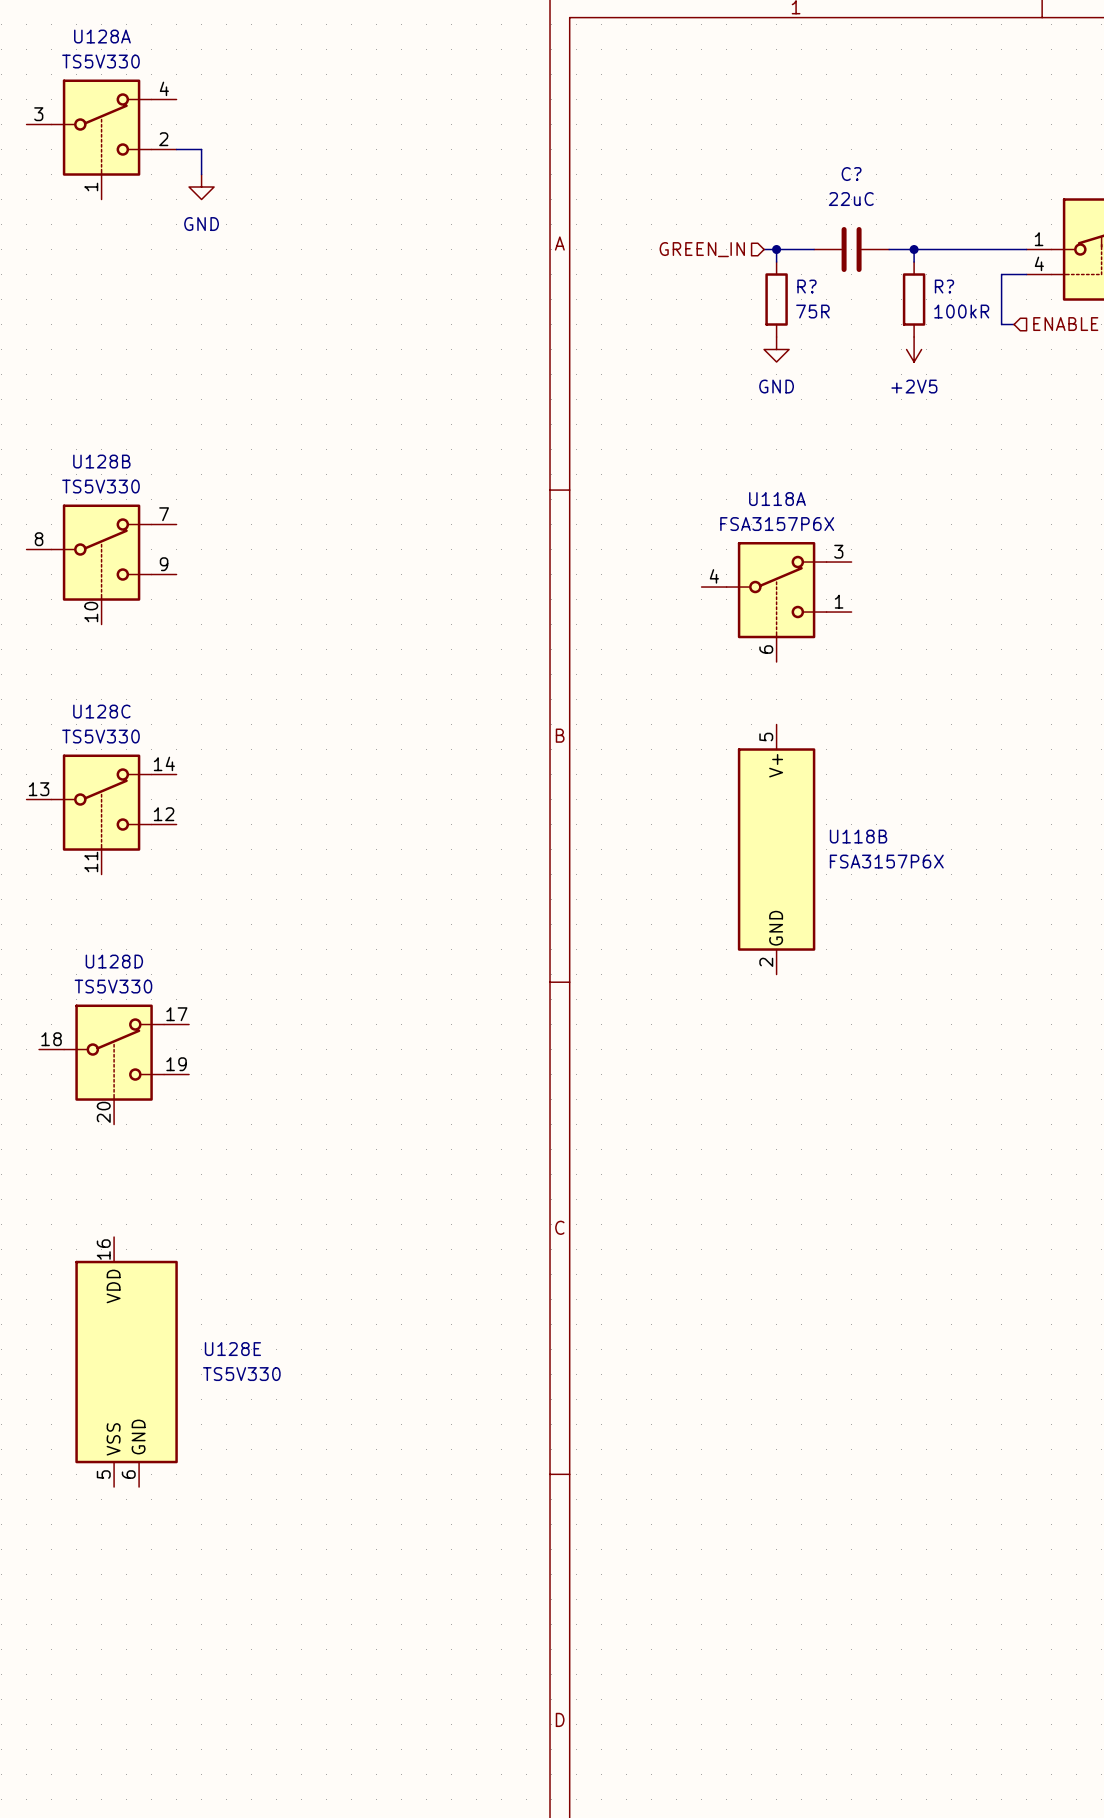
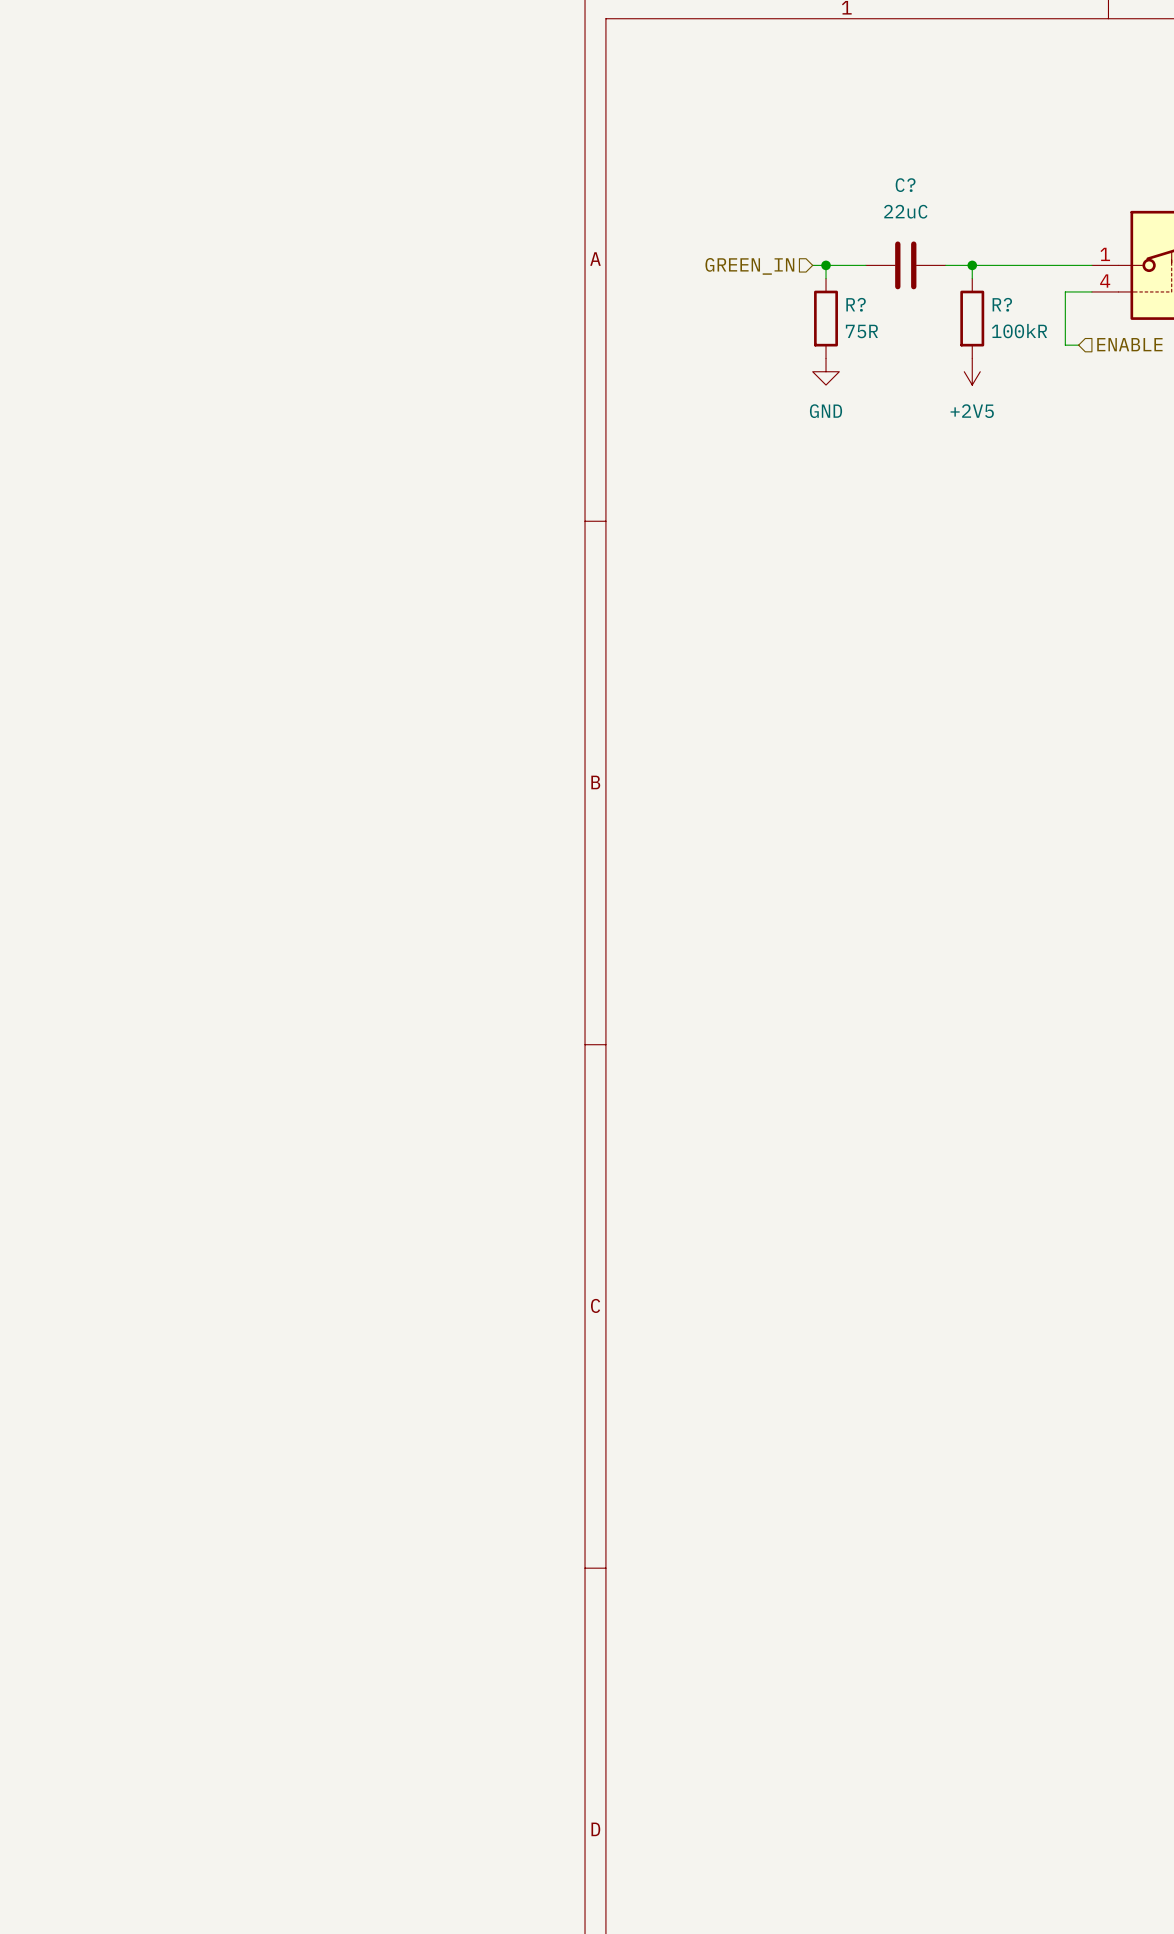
U128A: TS5V330 (101, 139) -> none
wire: (176, 149) (201, 149) (201, 174) -> none
power symbol: GND (201, 187) -> none
U128B: TS5V330 (101, 564) -> none
U118A: FSA3157P6X (776, 602) -> none
U128C: TS5V330 (101, 814) -> none
U118B: FSA3157P6X (776, 849) -> none
U128D: TS5V330 (114, 1064) -> none
U128E: TS5V330 (126, 1362) -> none

